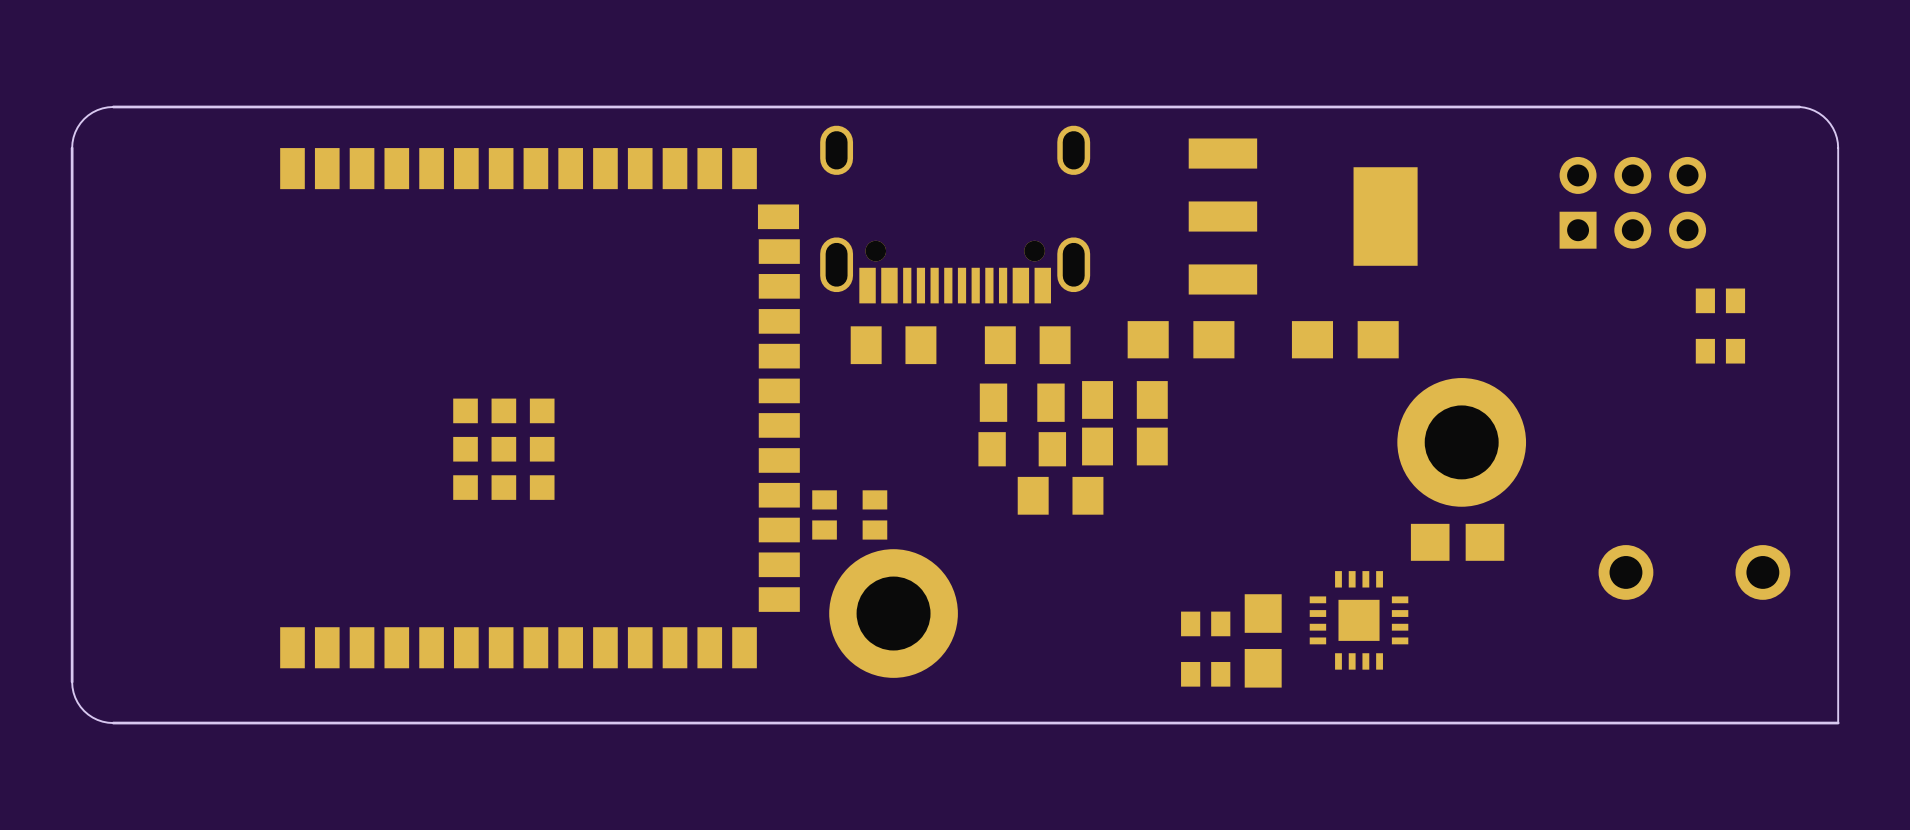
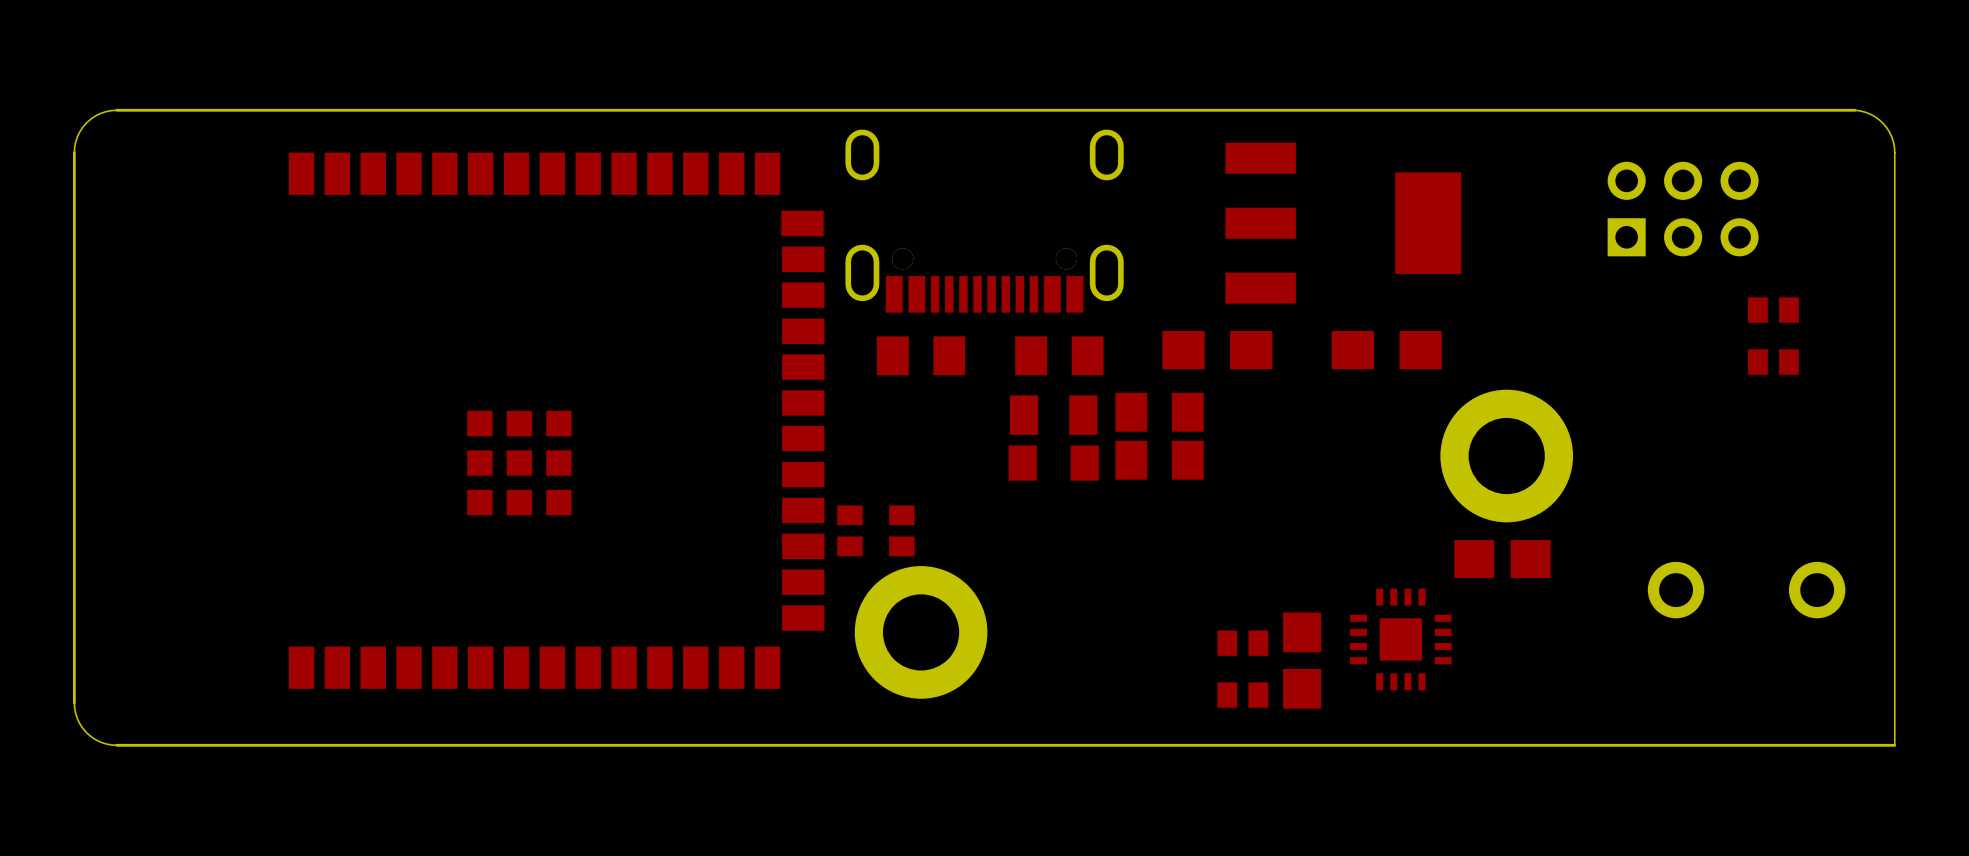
part: (1060, 495) -> none

